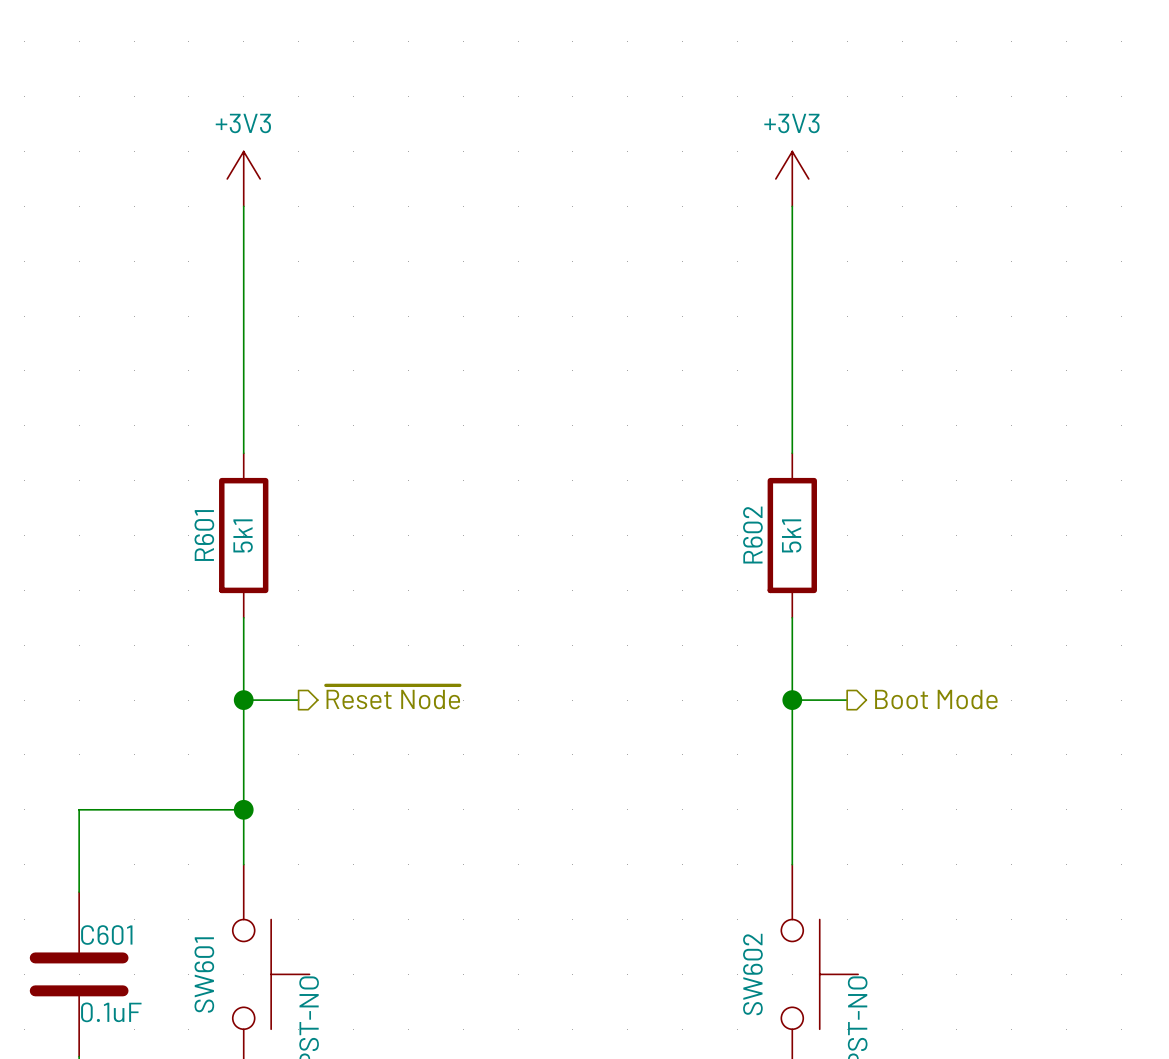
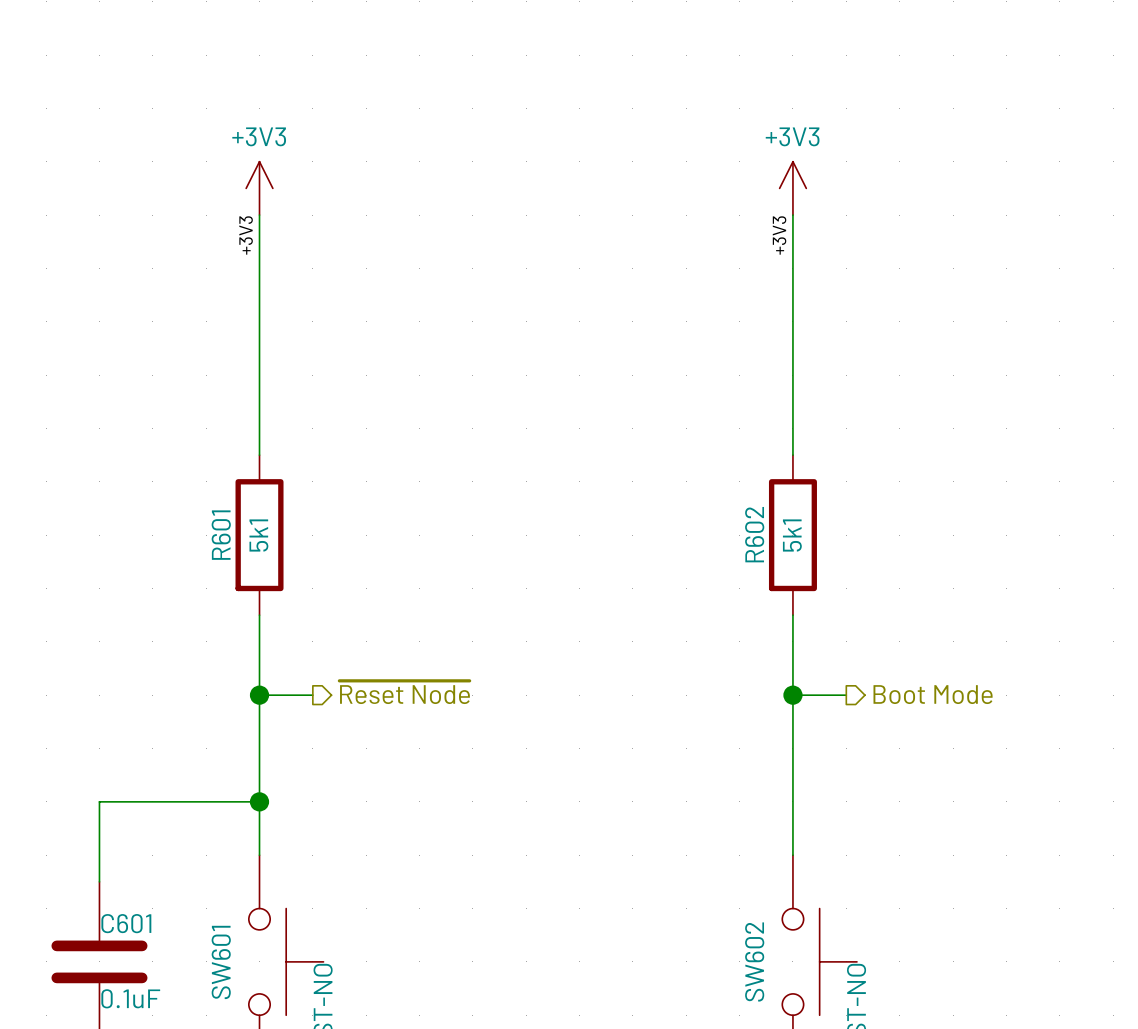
power symbol: +3V3 (243, 178) -> none
part: none -> +3V3 (259, 188)
power symbol: +3V3 (792, 178) -> none
part: none -> +3V3 (792, 188)
label: none -> +3V3 (246, 235)
label: none -> +3V3 (779, 235)

